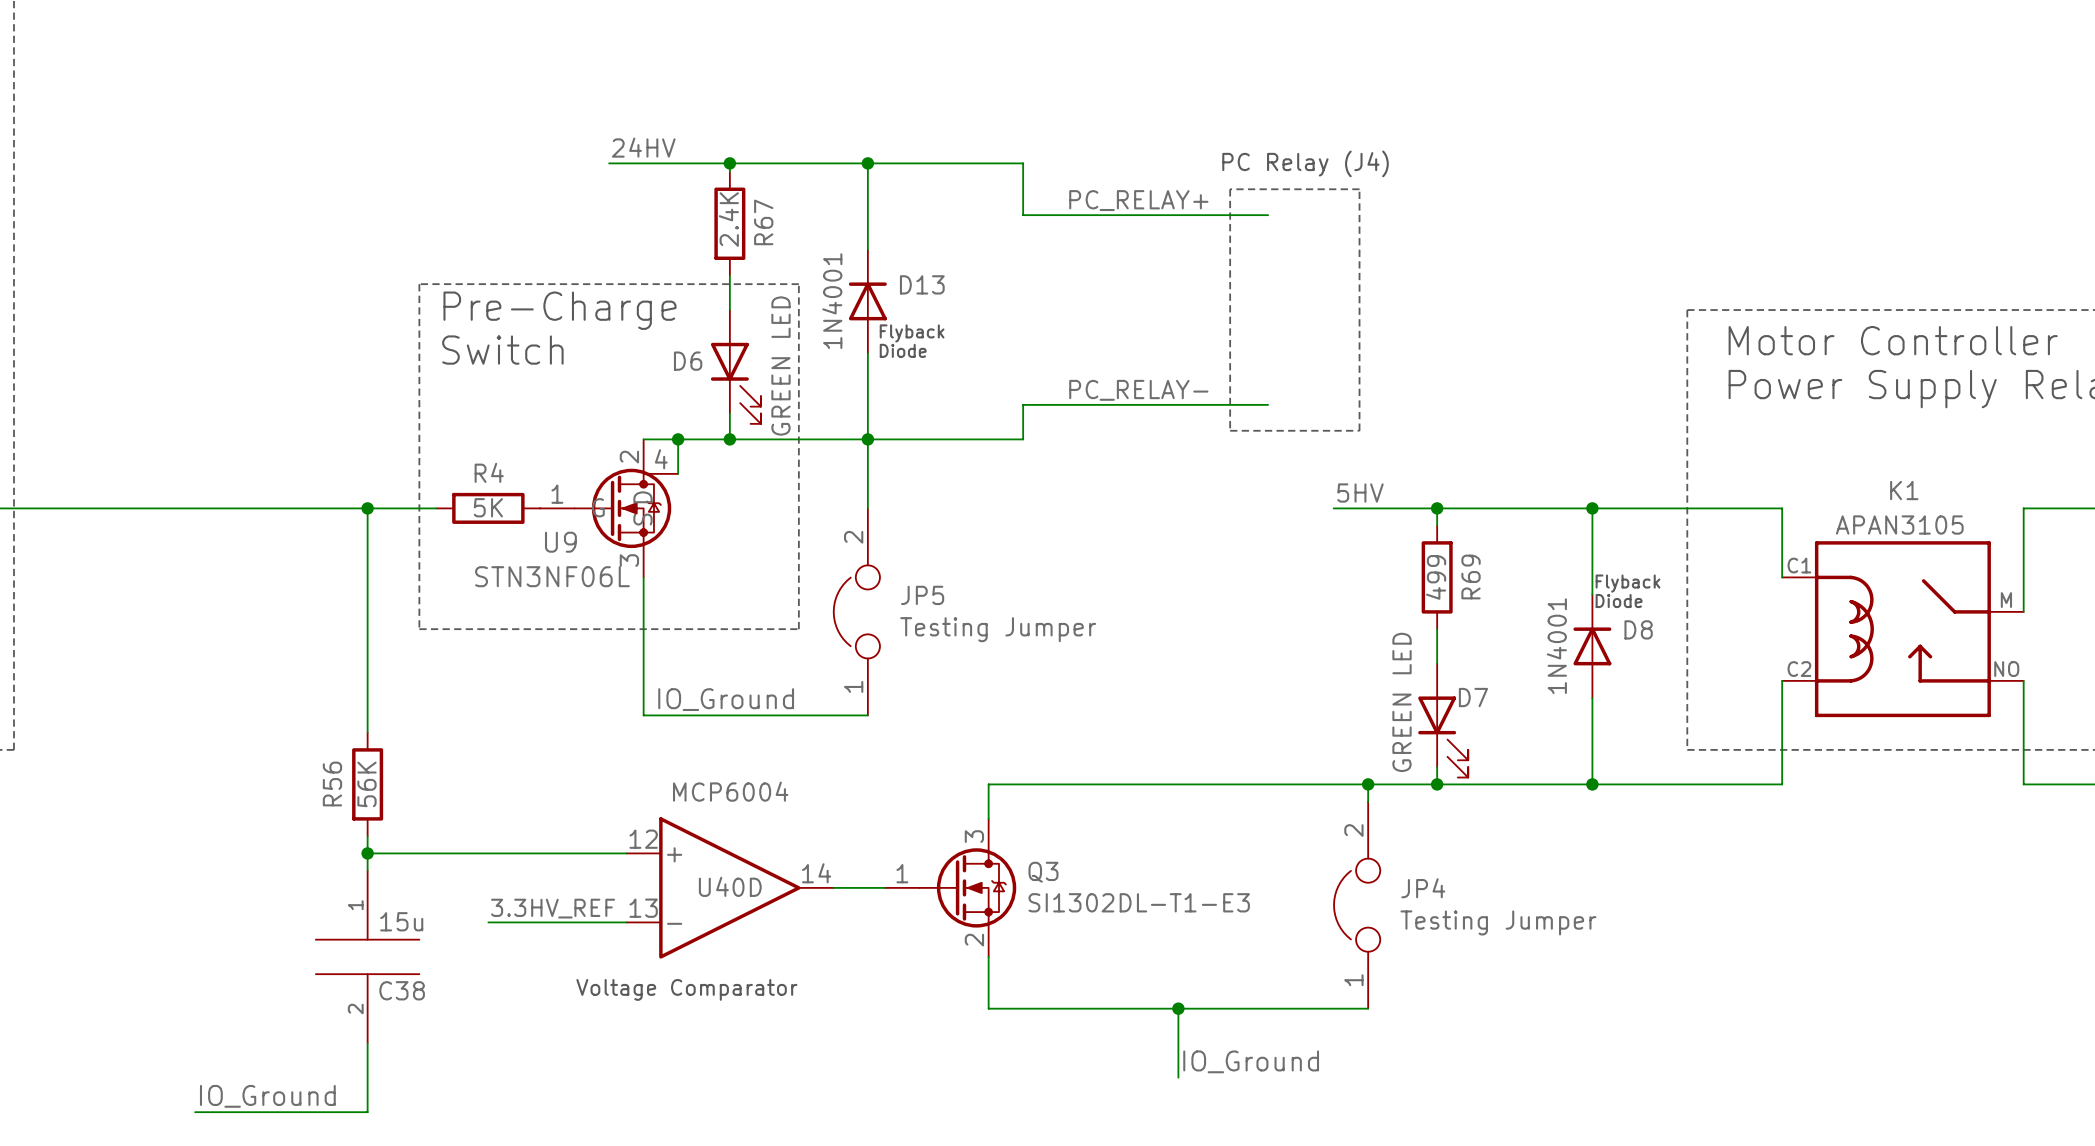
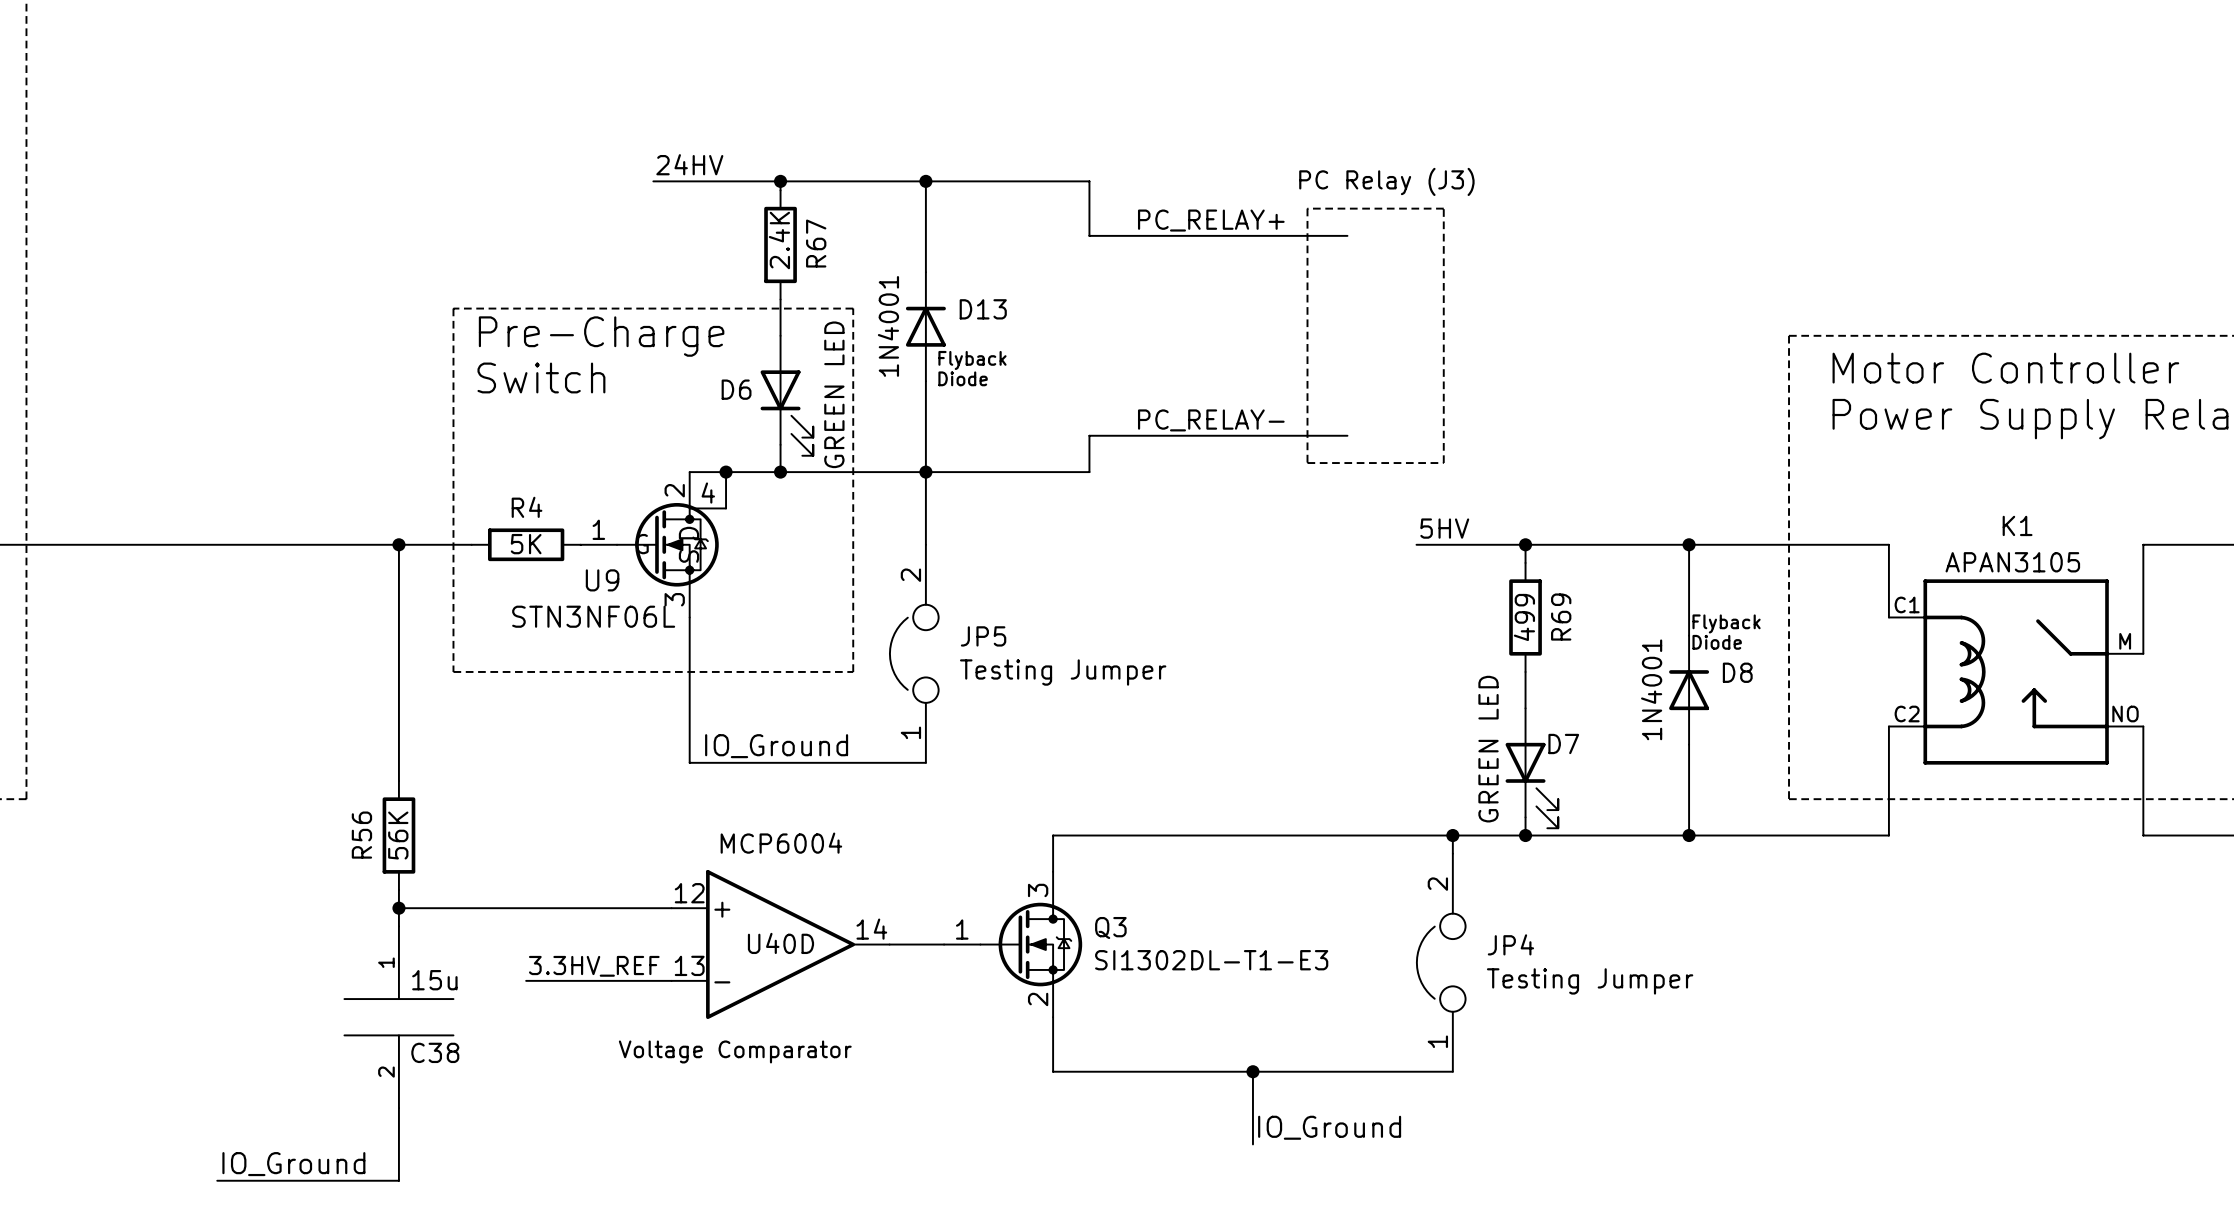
text: PC Relay (J4) (1305, 163) -> PC Relay (J3) (1386, 181)

